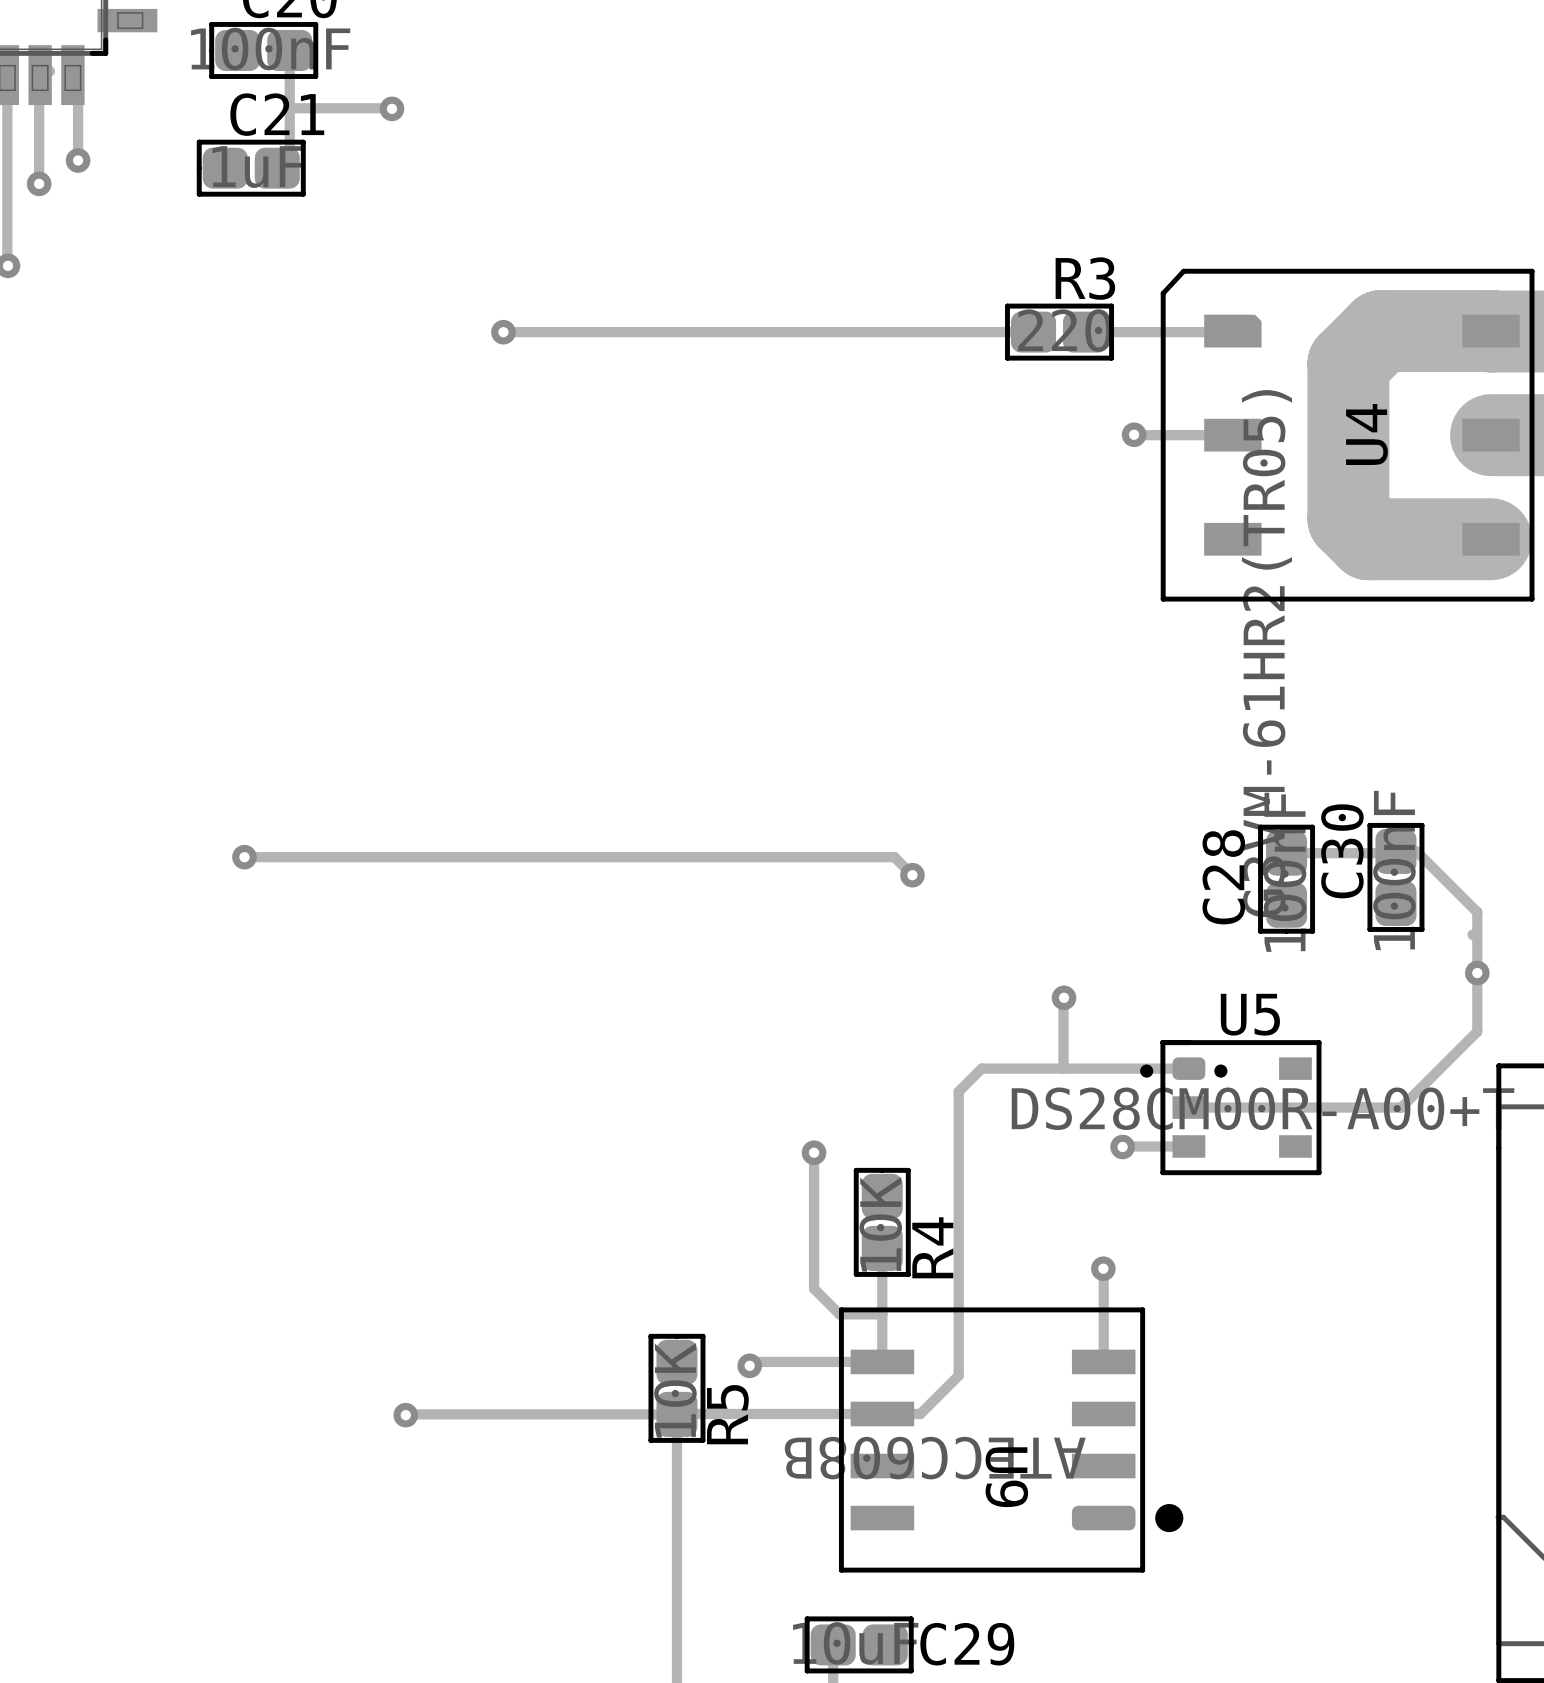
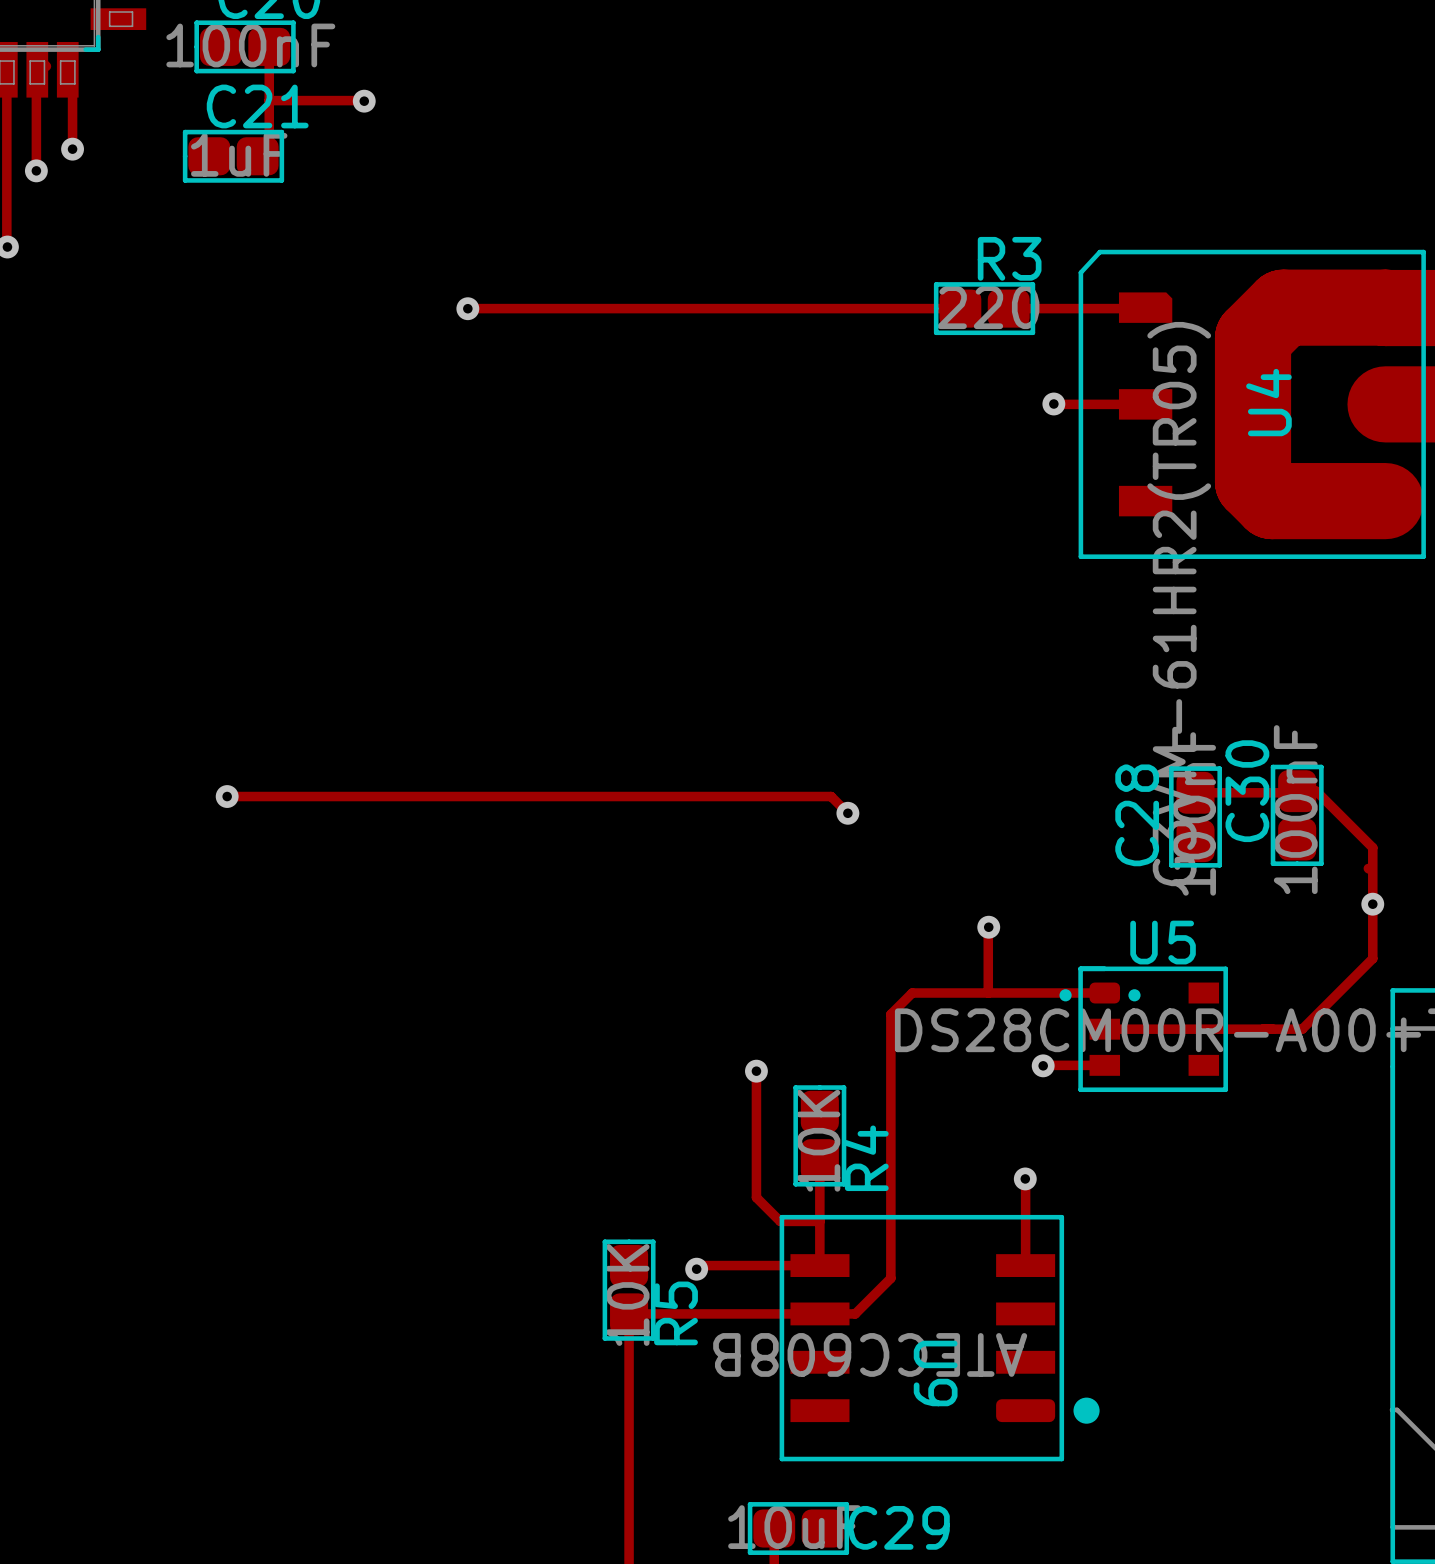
track: (676, 1414) (405, 1415) -> none
via: (405, 1415) -> none

